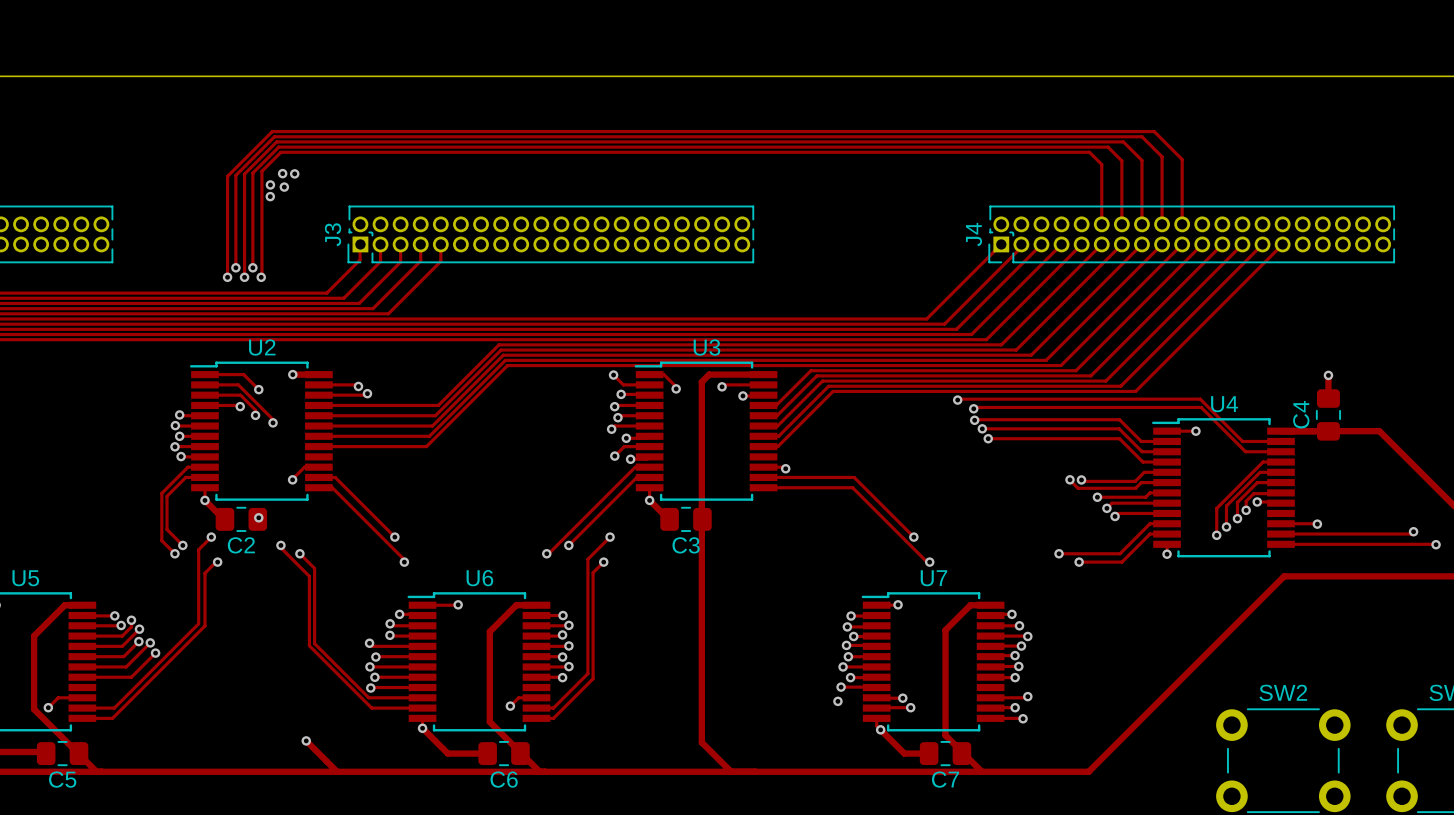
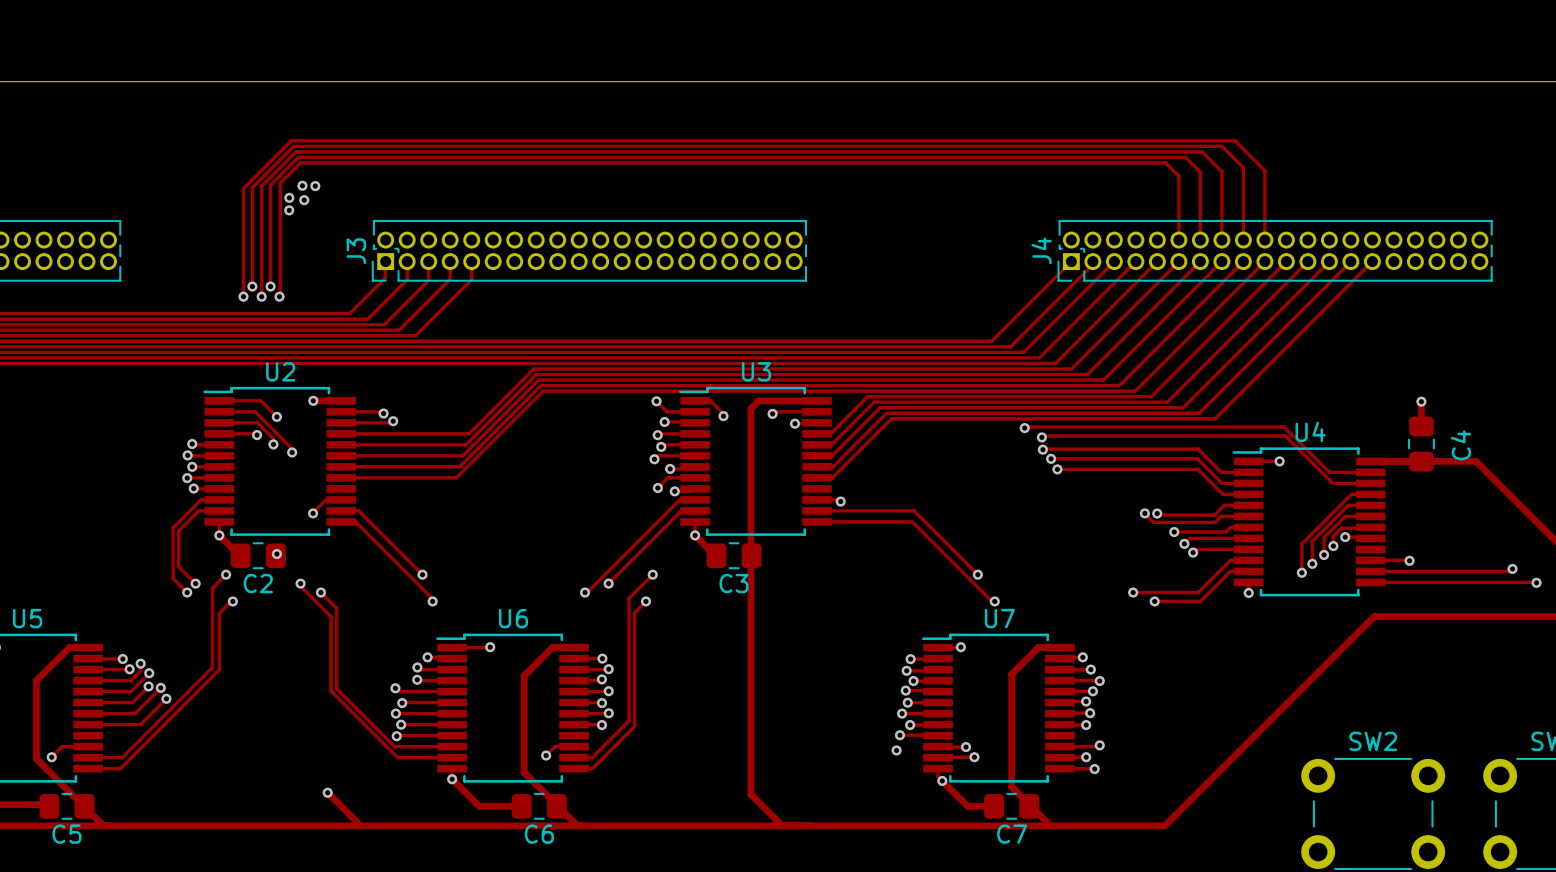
C4 name position: C4 (1301, 414) -> C4 (1461, 445)

